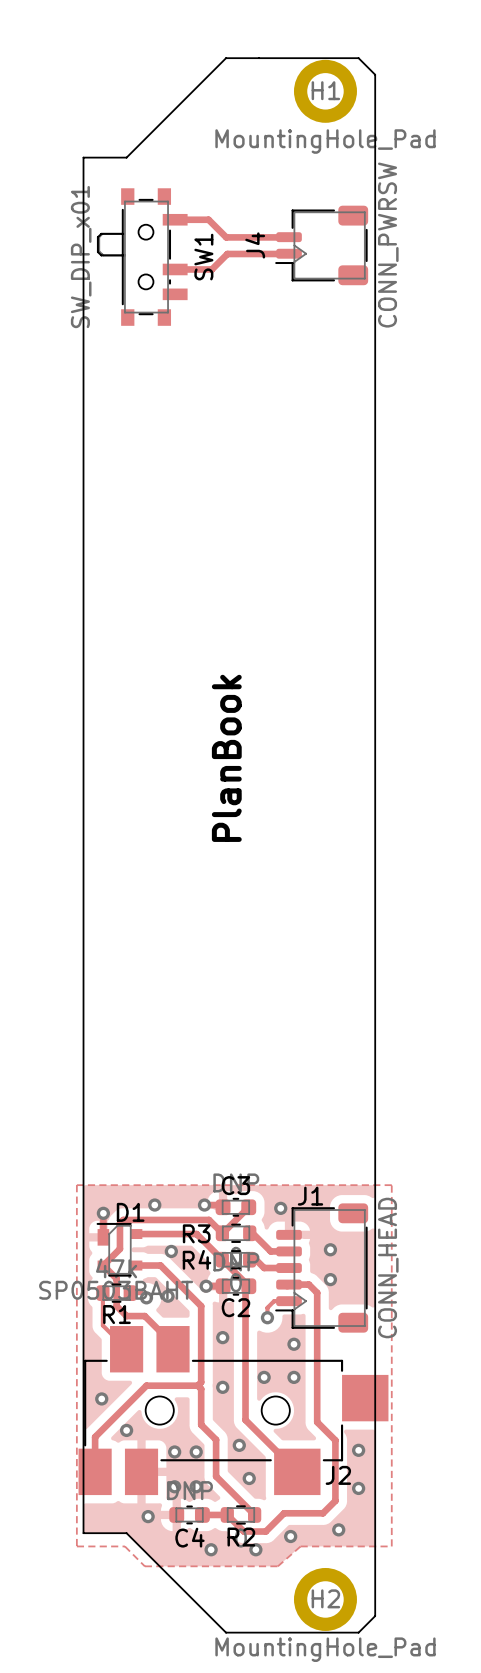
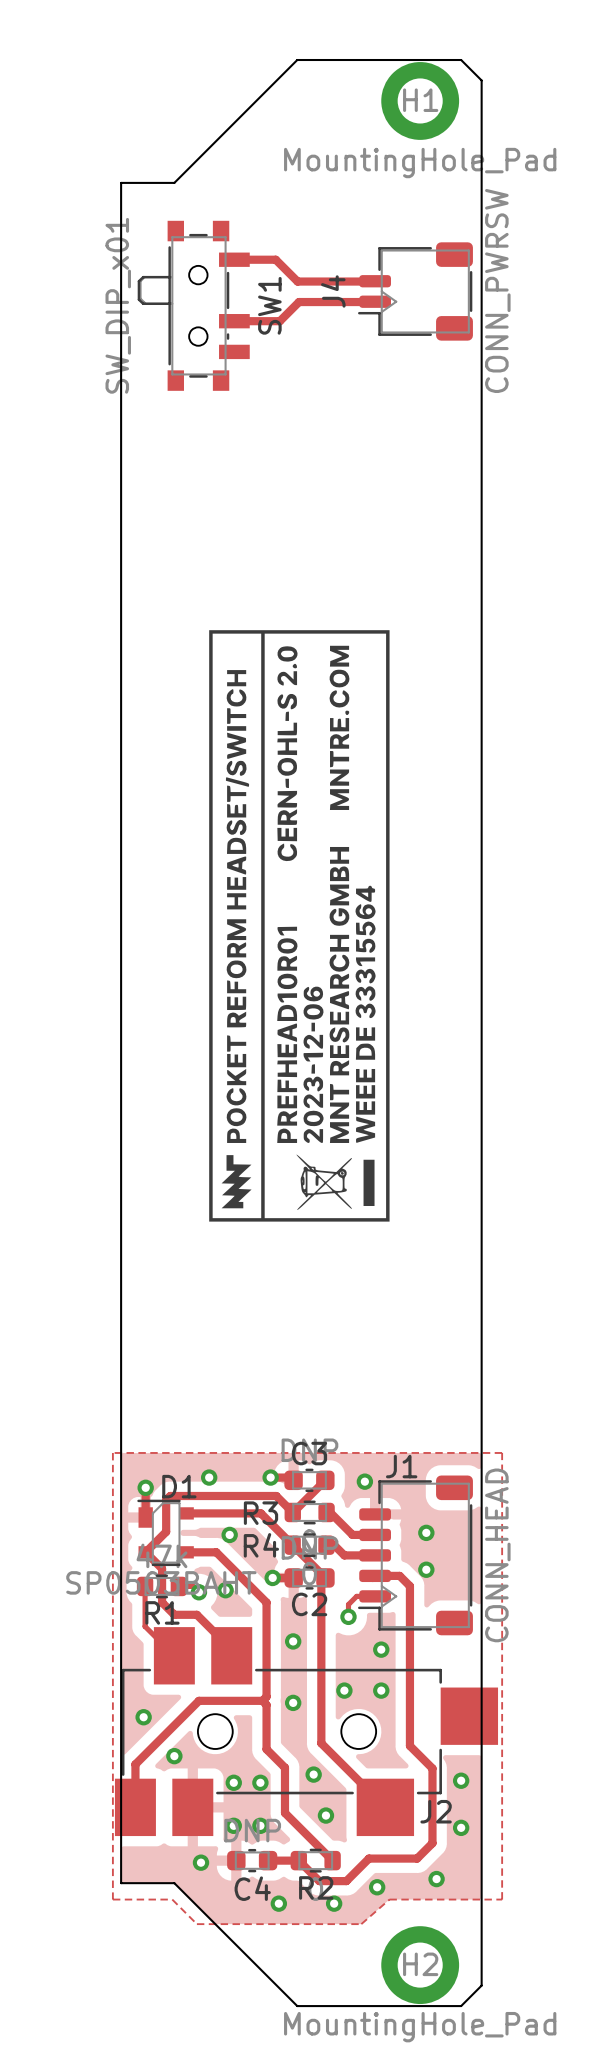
drawing: none -> [209, 630, 390, 1222]
text: PlanBook (226, 758) -> none

